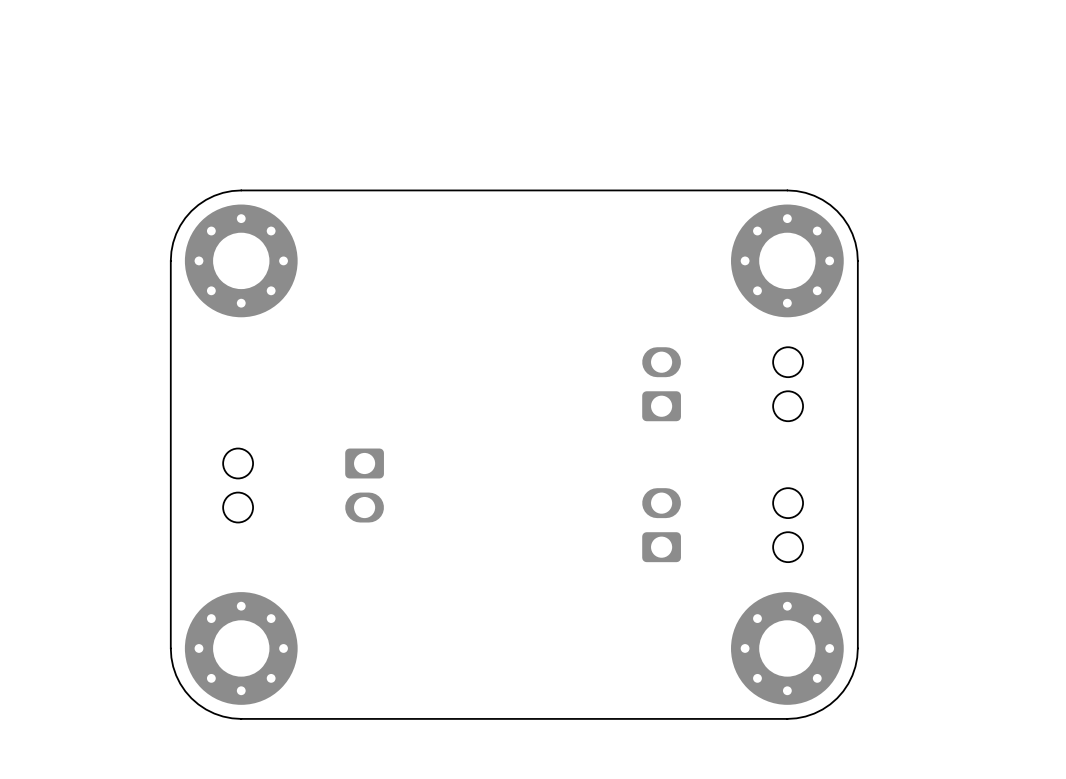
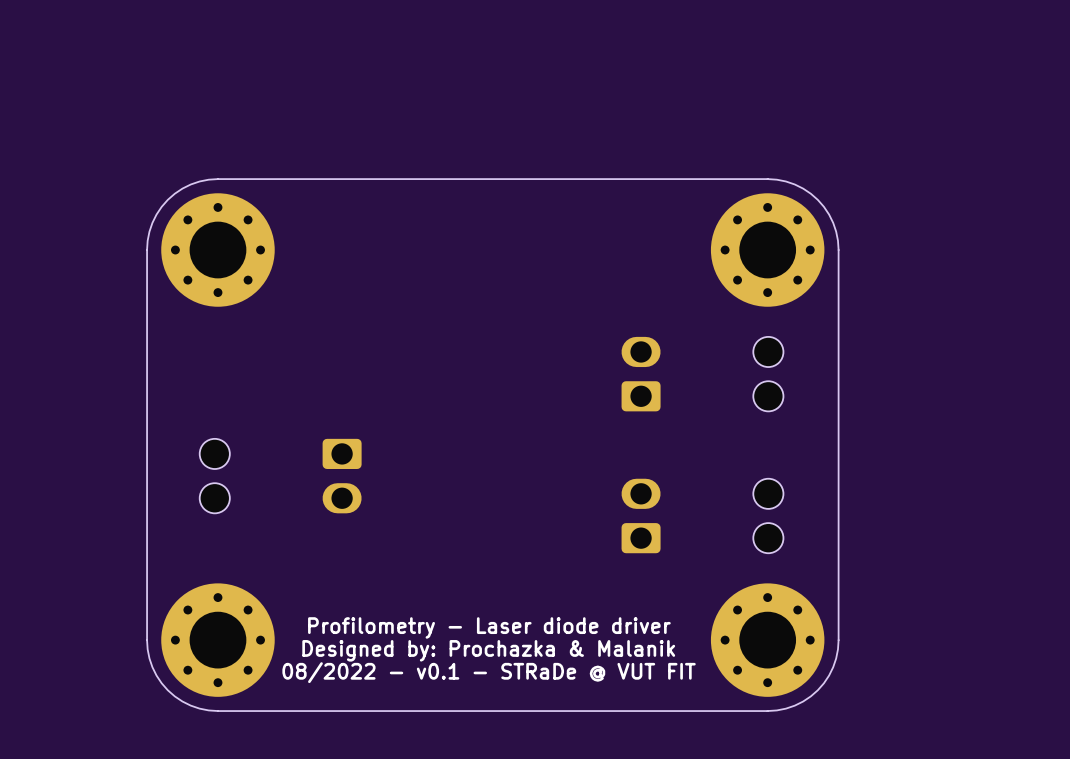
text: none -> Profilometry - Laser diode driver (489, 627)
text: none -> Designed by: Prochazka & Malanik (488, 650)
text: none -> 08/2022 - v0.1 - STRaDe @ VUT FIT (489, 672)

